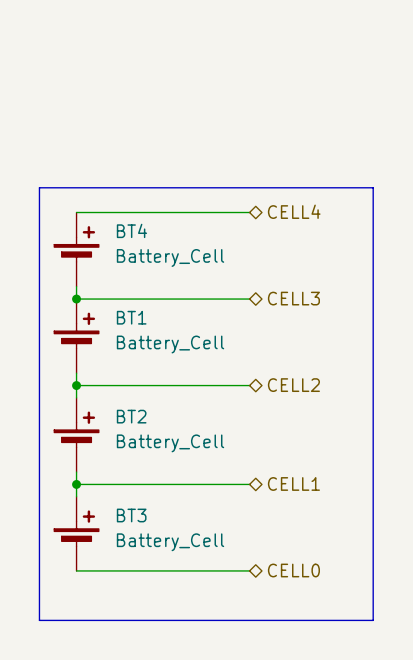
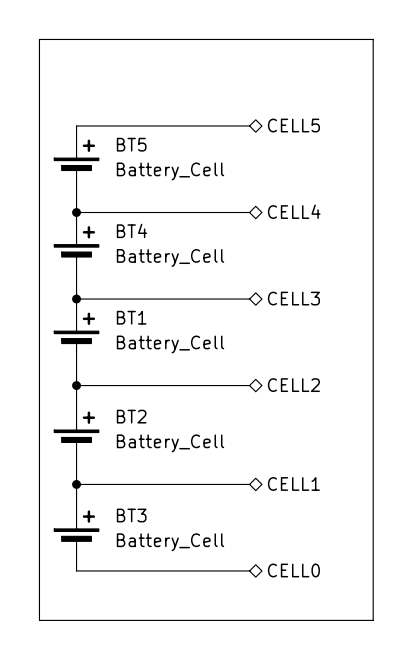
wire: none -> (76, 125) (249, 125)
hierarchical label: none -> CELL5 (293, 125)
BT5: none -> Battery_Cell (76, 163)
line: (39, 187) (373, 187) -> (39, 187) (39, 39) (373, 39) (373, 187)
wire: none -> (76, 200) (76, 212)
junction: none -> (76, 212)

